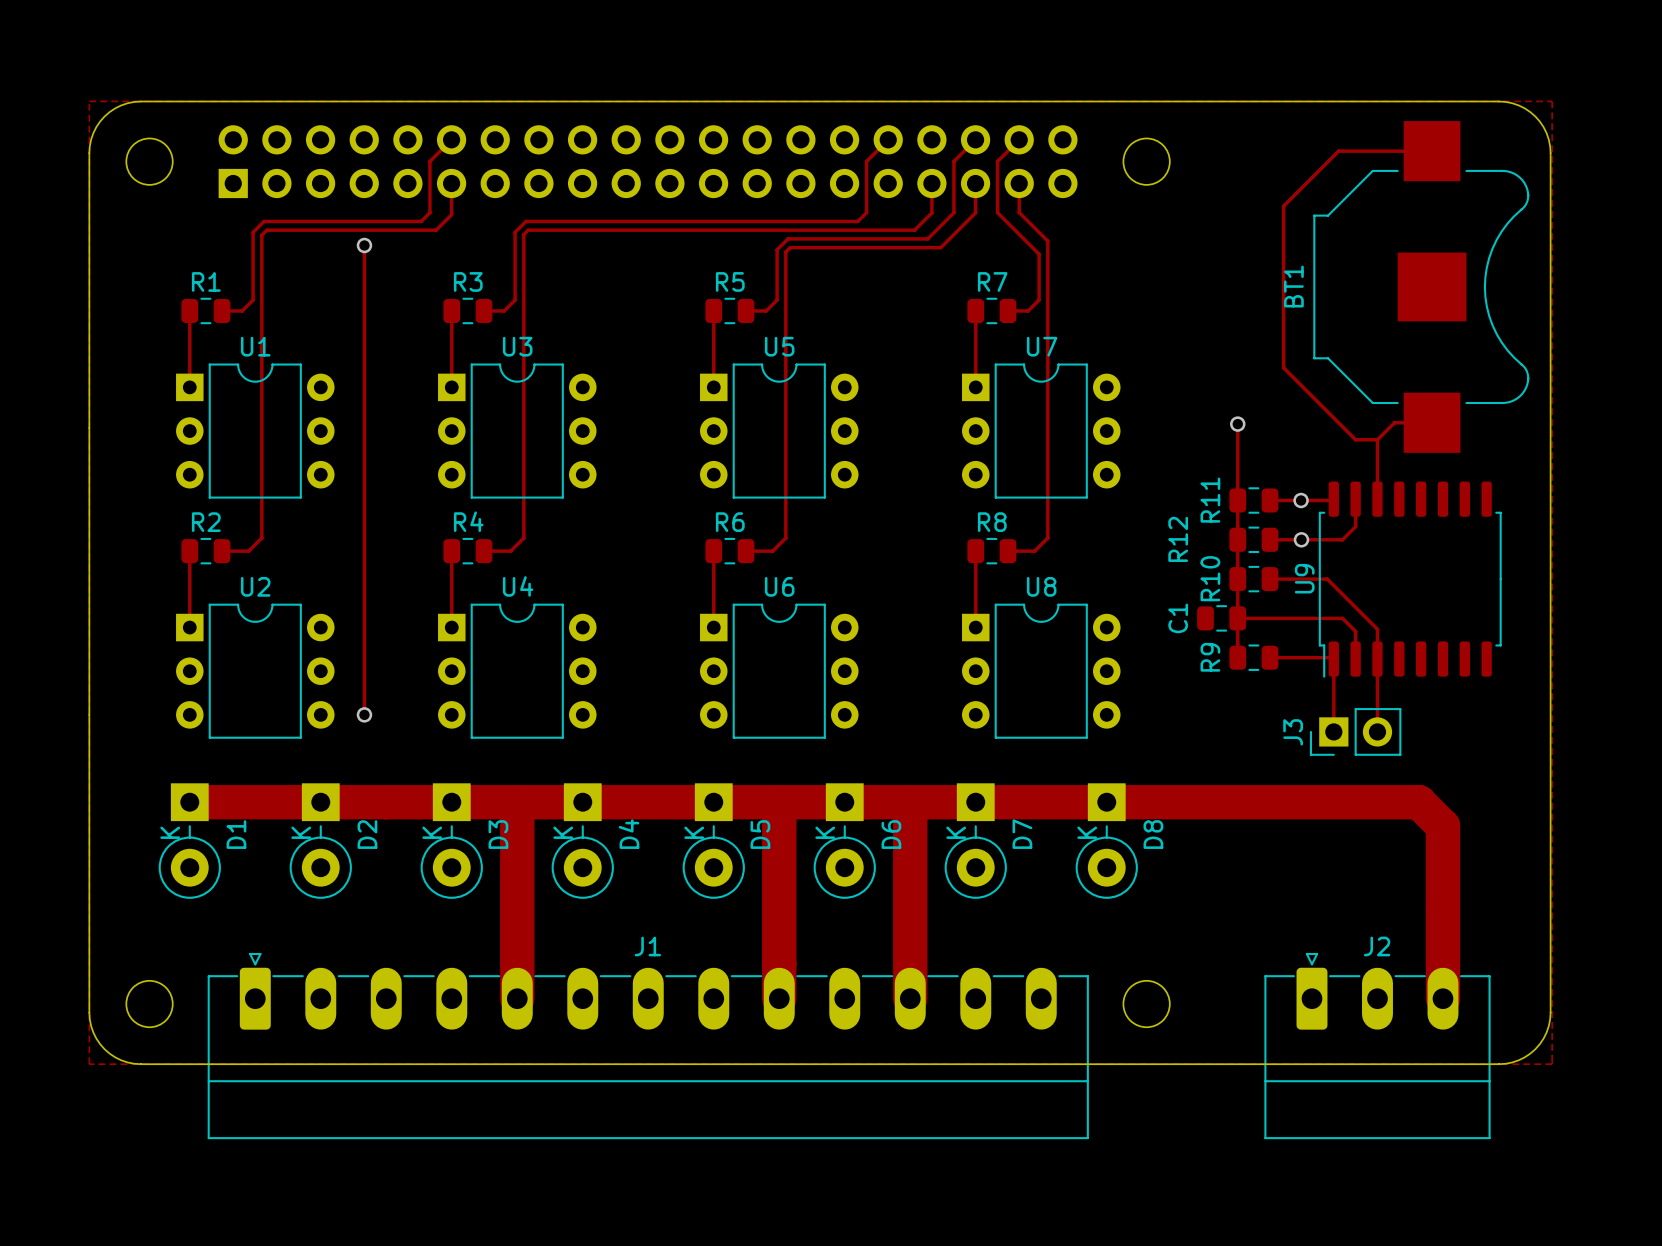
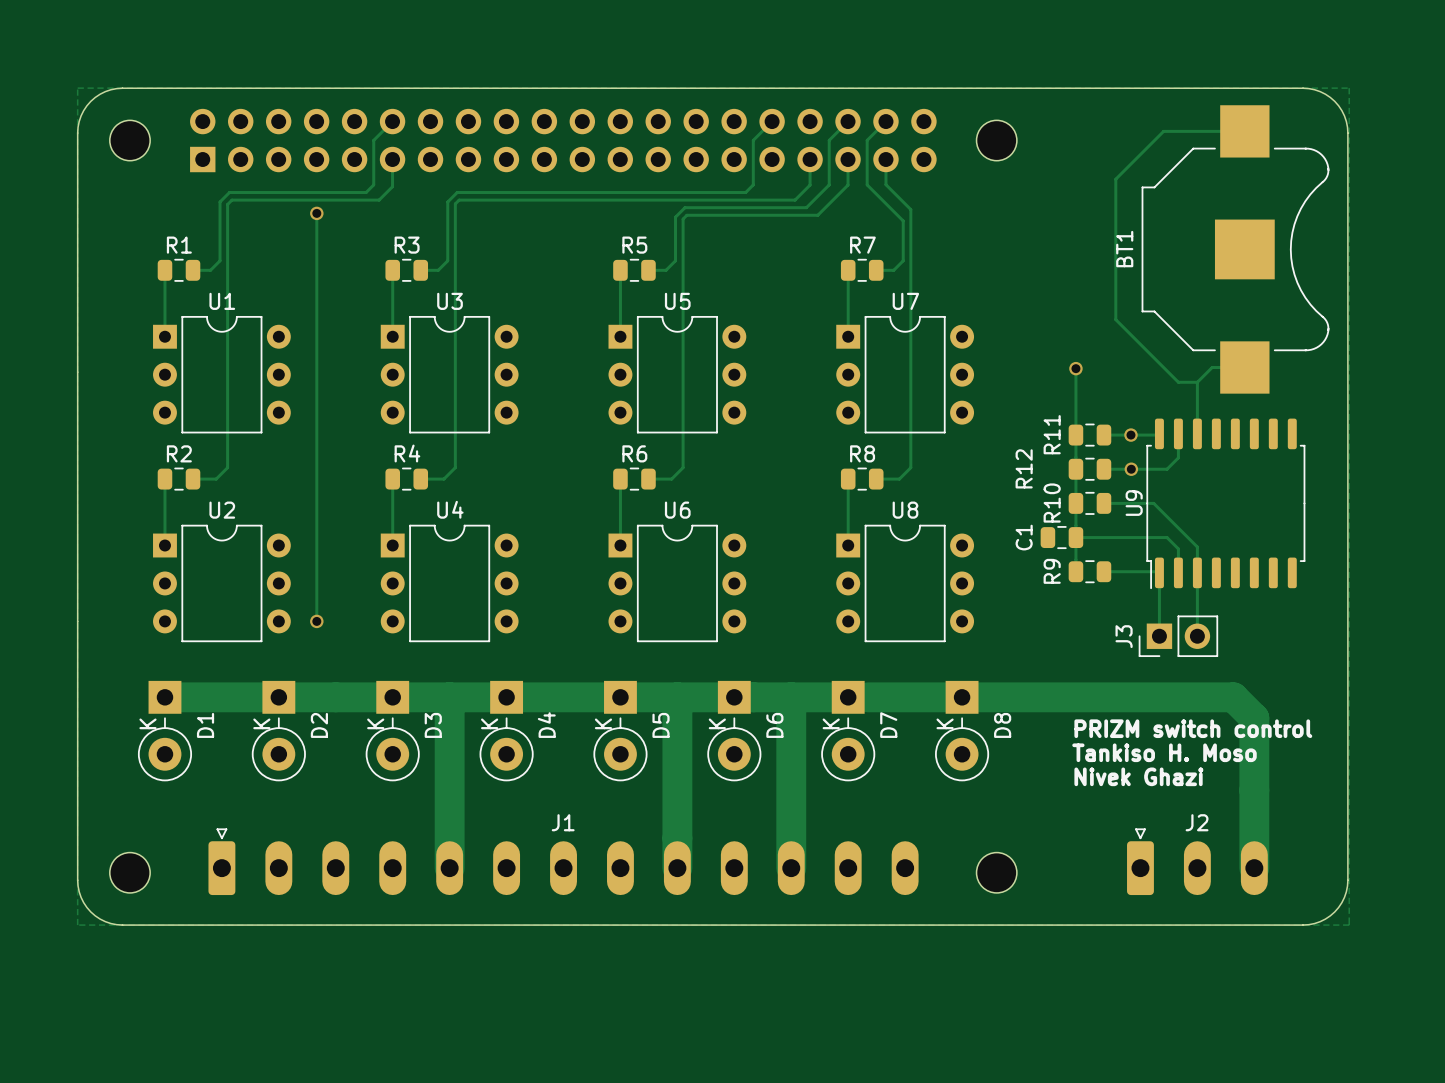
text: none -> PRIZM switch control (1193, 728)
text: none -> Tankiso H. Moso (1164, 752)
text: none -> Nivek Ghazi (1138, 776)
J1 footprint: [207, 952, 1089, 1140] -> [208, 828, 919, 896]
J2 footprint: [1264, 952, 1491, 1140] -> [1127, 828, 1268, 896]

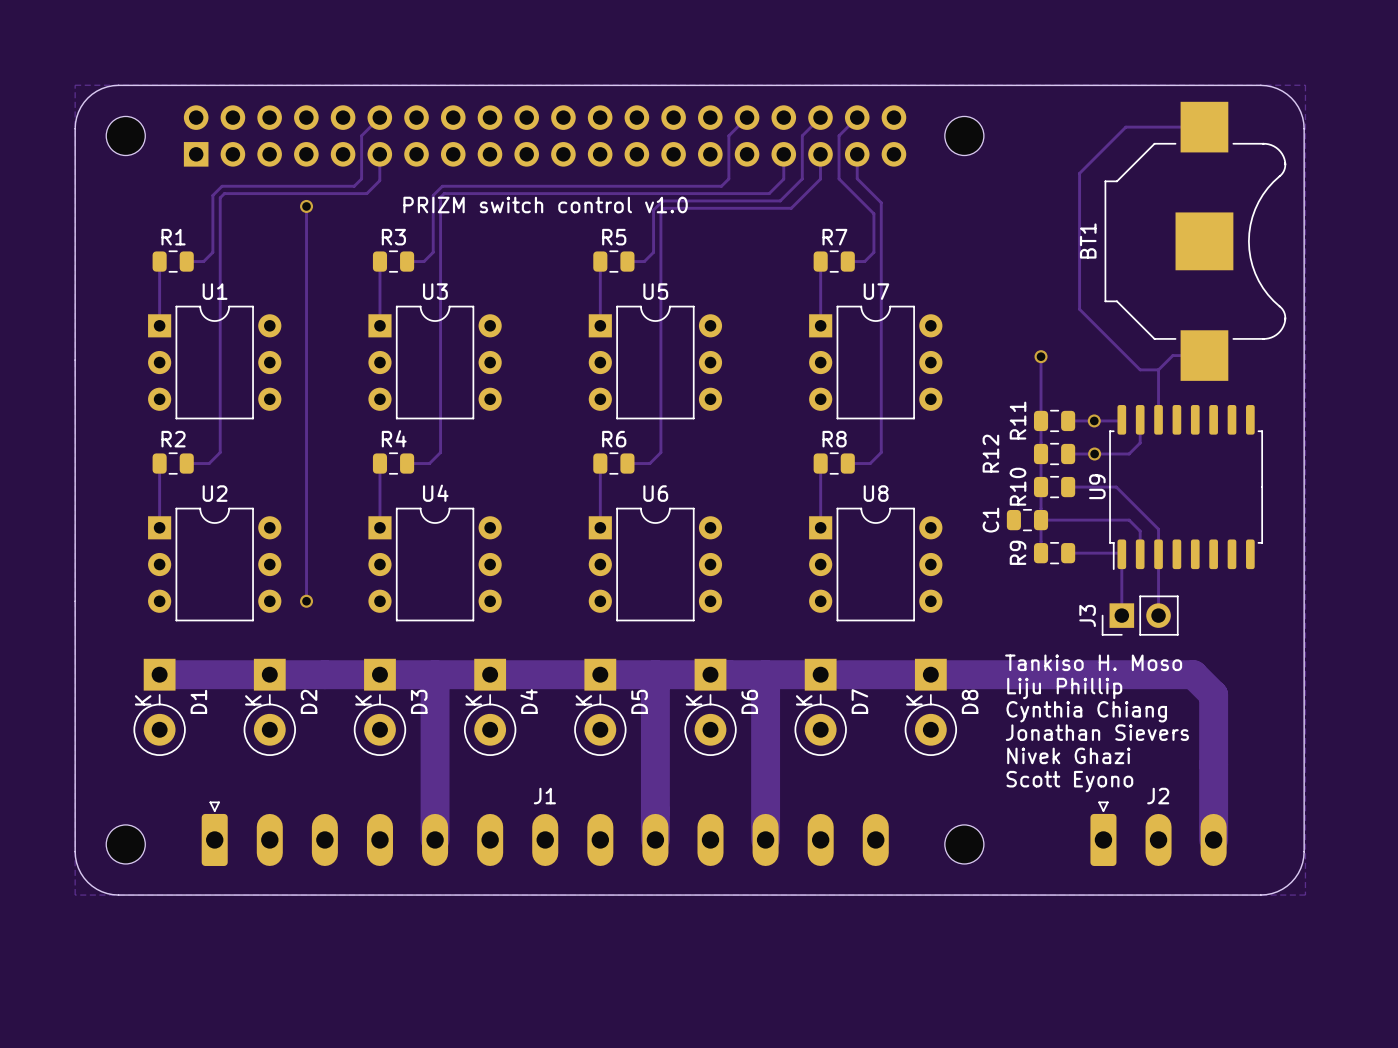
text: none -> PRIZM switch control v1.0 (545, 205)
text: none -> Liju Phillip (1064, 688)
text: PRIZM switch control (1193, 728) -> none
text: none -> Cynthia Chiang (1086, 711)
text position: Tankiso H. Moso (1164, 752) -> Tankiso H. Moso (1093, 662)
text: none -> Jonathan Sievers (1097, 732)
text position: Nivek Ghazi (1138, 776) -> Nivek Ghazi (1068, 755)
text: none -> Scott Eyono (1069, 781)

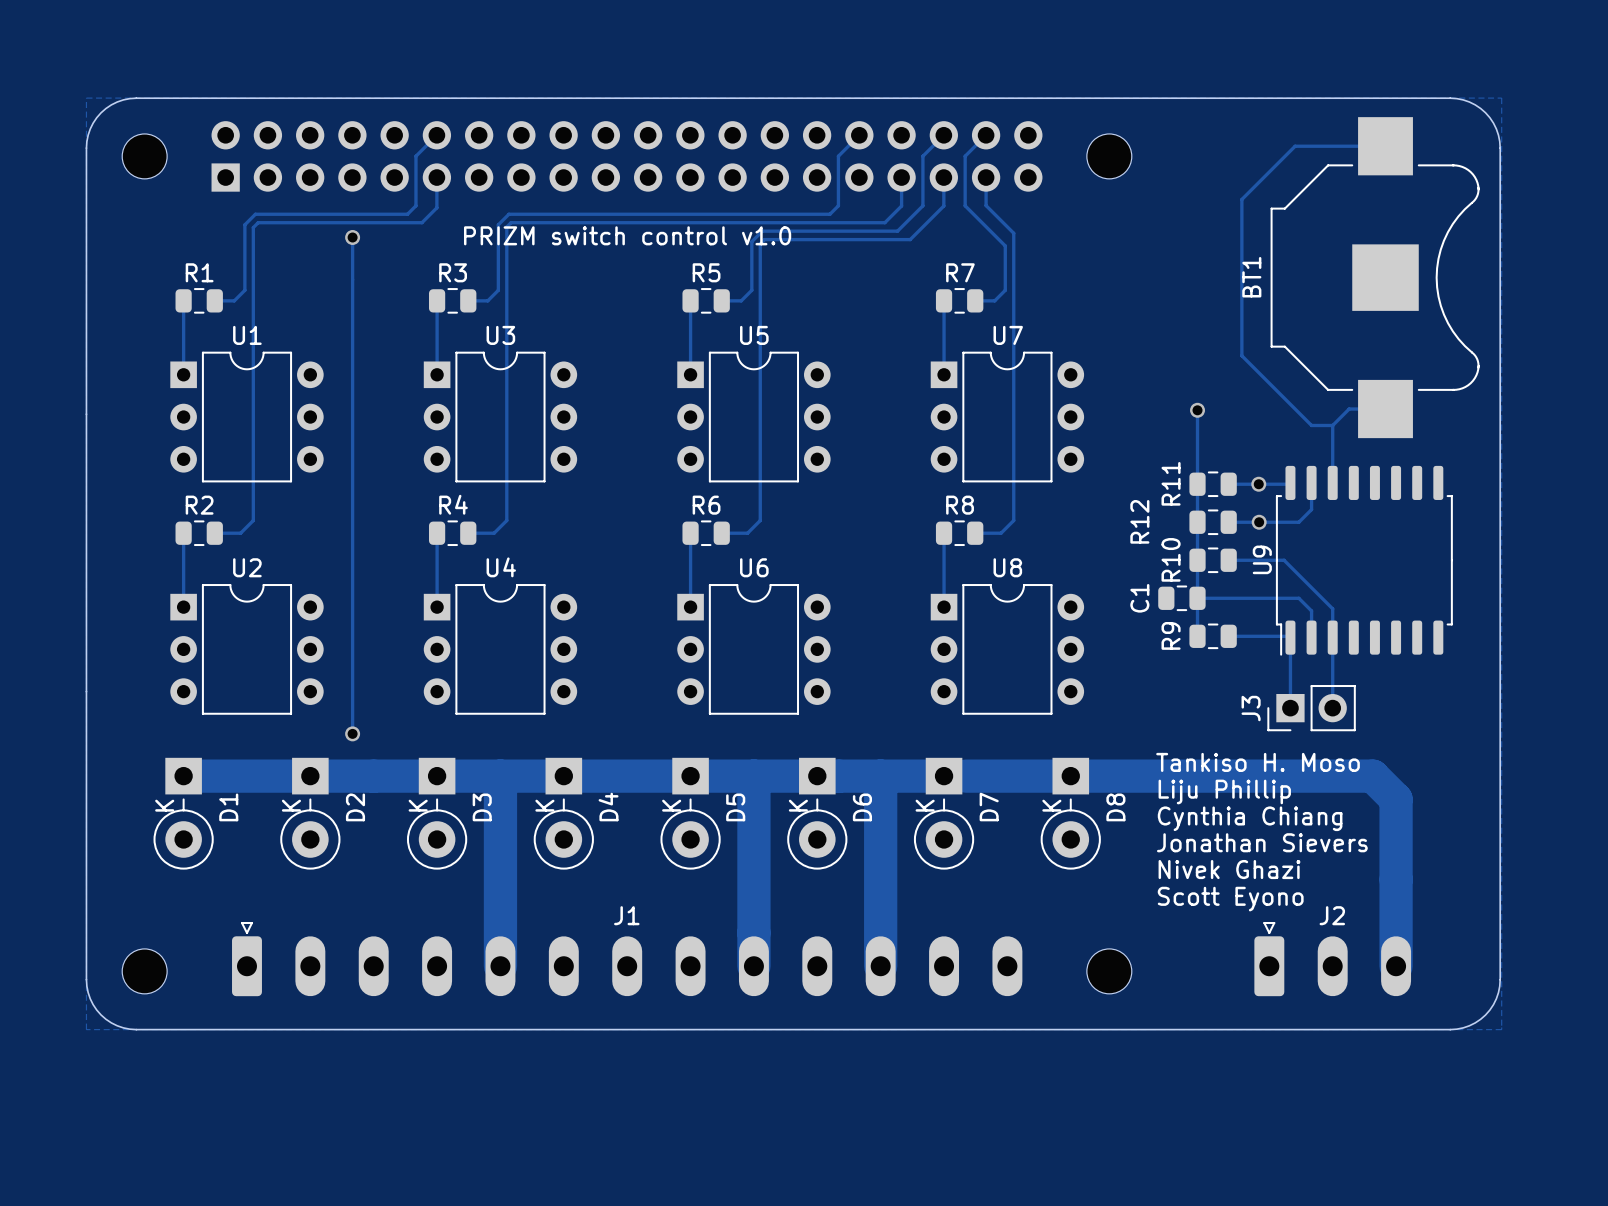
track: none -> (352, 691) (352, 733)
via position: (306, 601) -> (352, 733)

